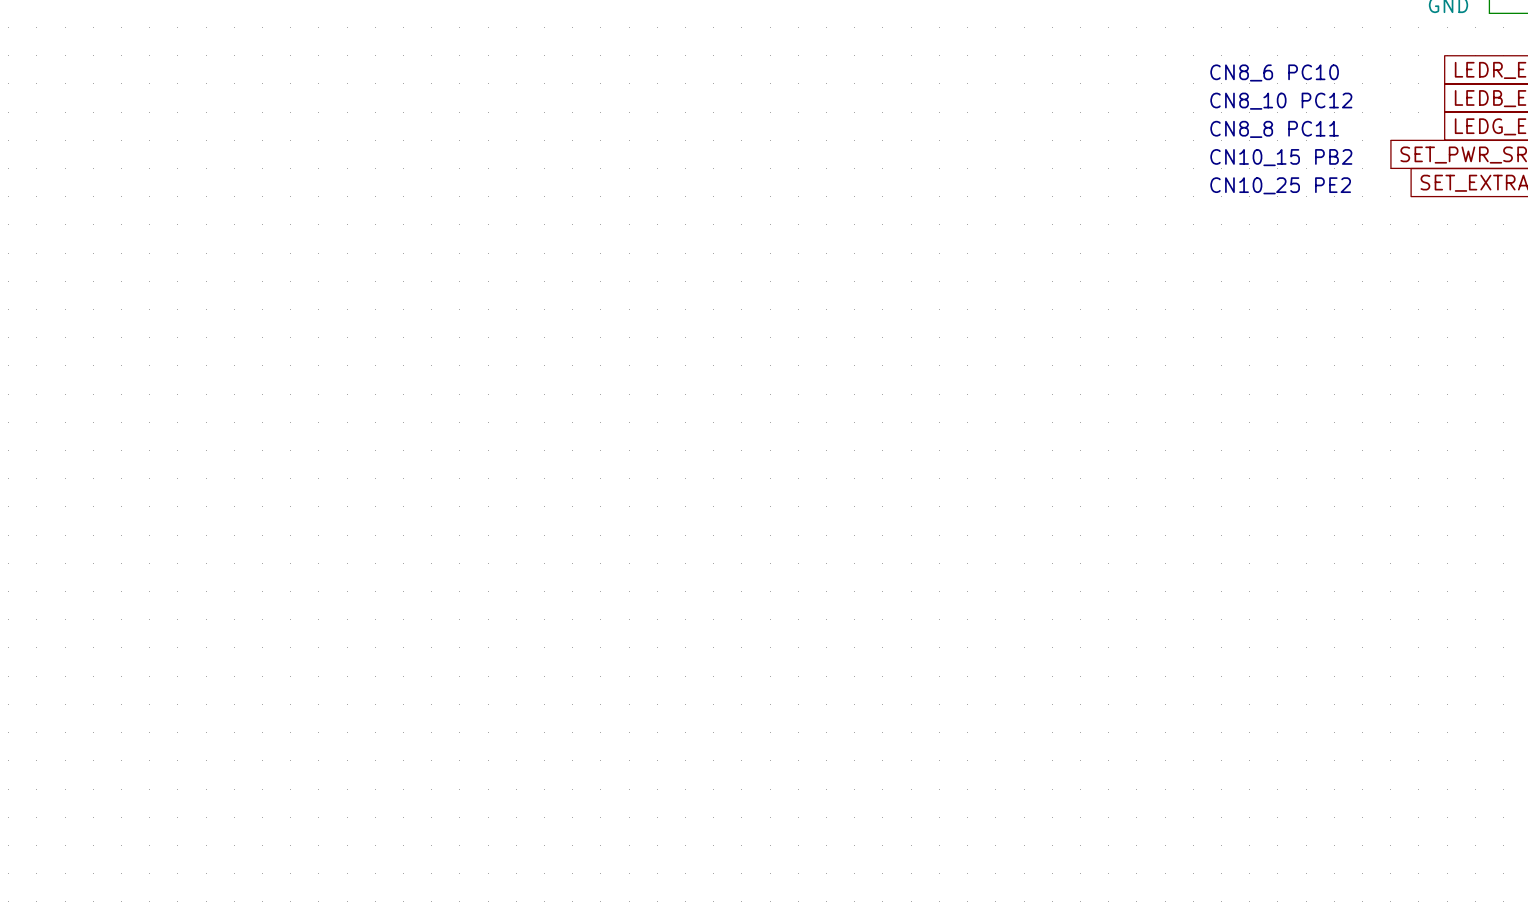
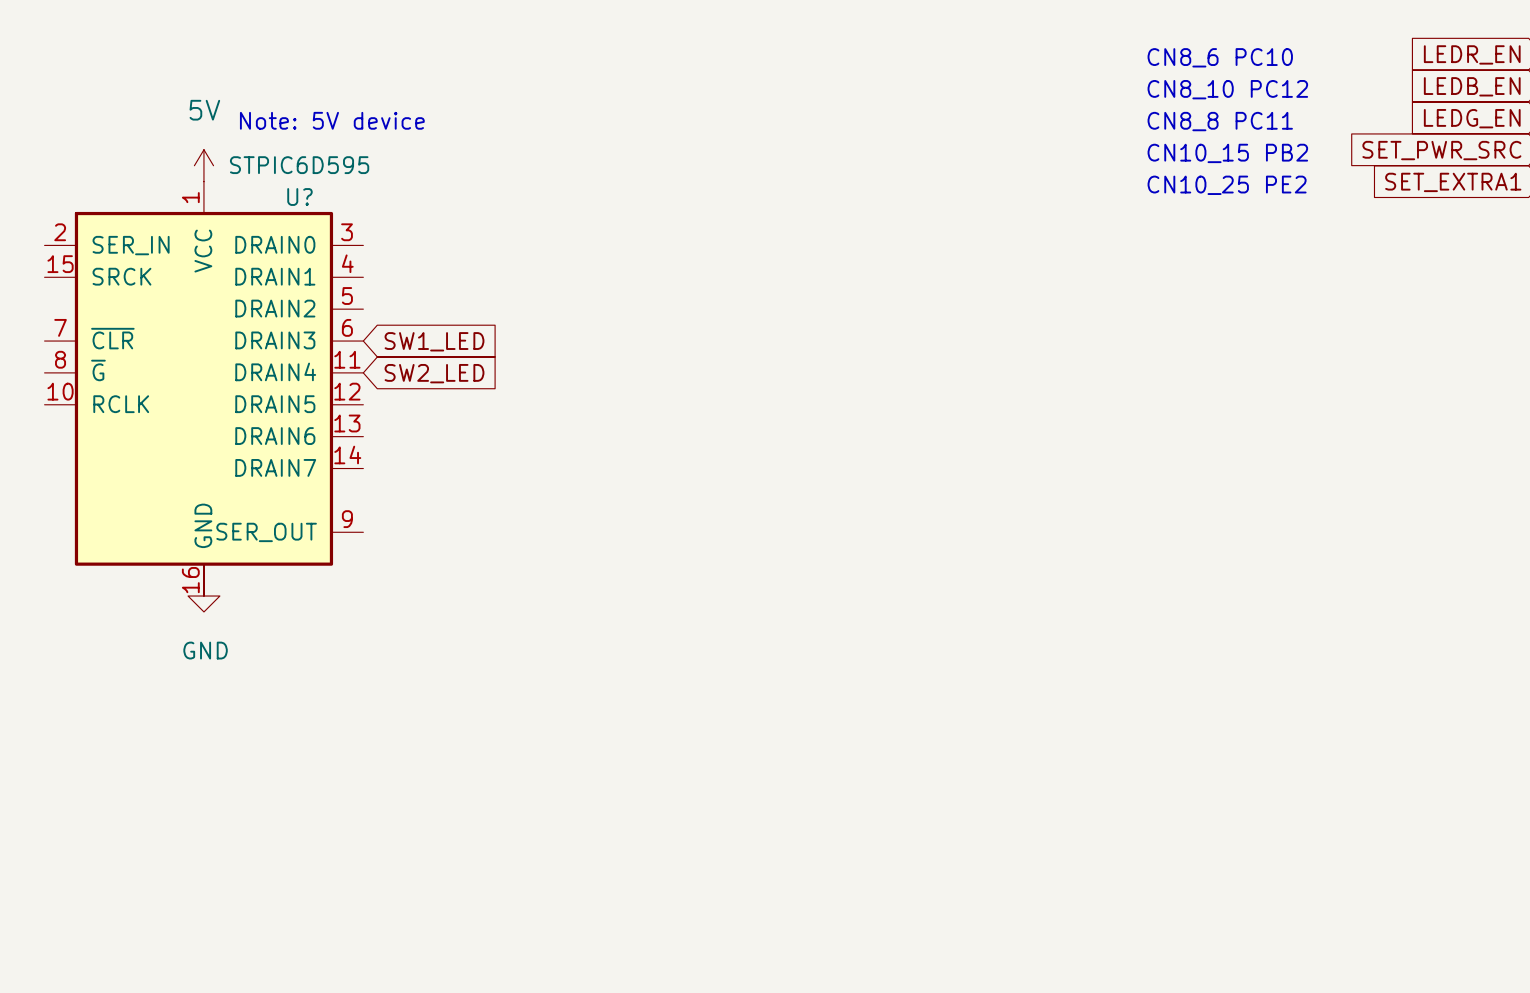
text: none -> Note: 5V device (332, 120)
power symbol: none -> 5V (203, 165)
global label: none -> SW1_LED (434, 341)
global label: none -> SW2_LED (434, 373)
U?: none -> STPIC6D595 (203, 388)
power symbol: none -> GND (203, 588)

